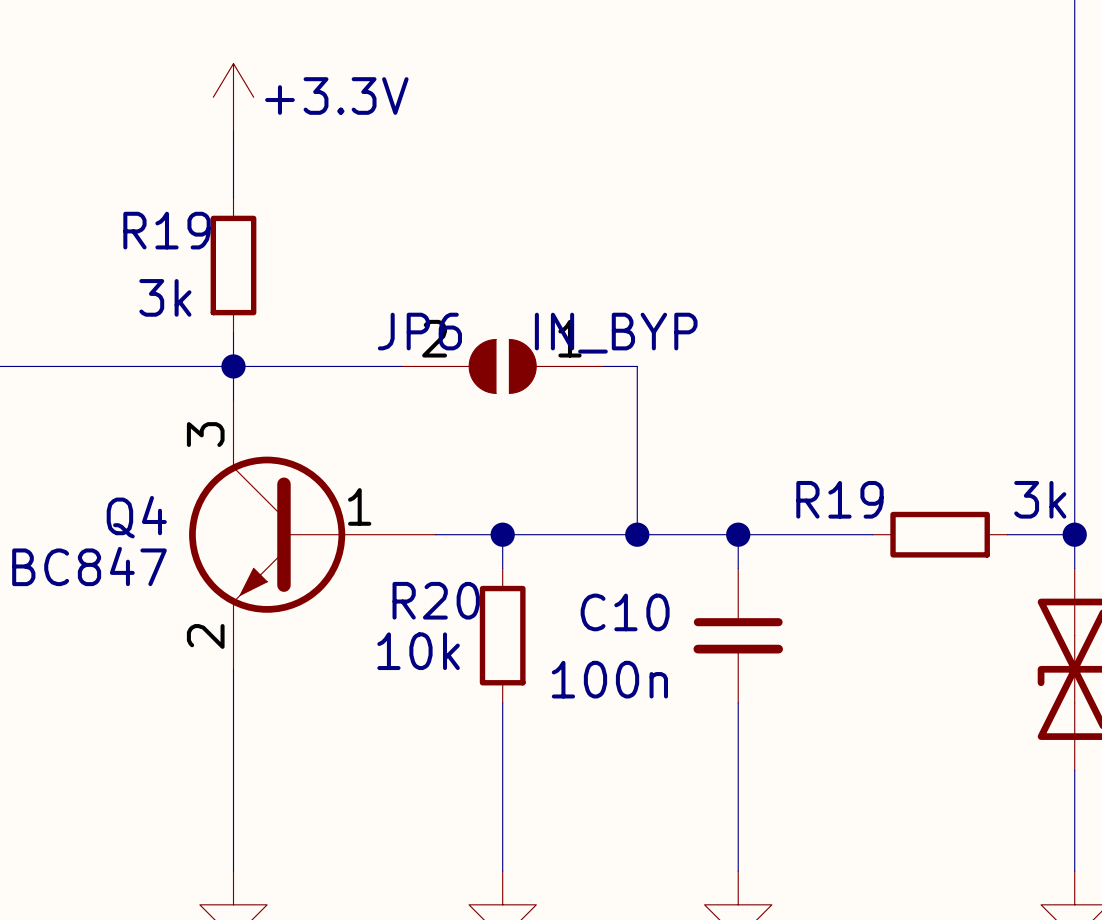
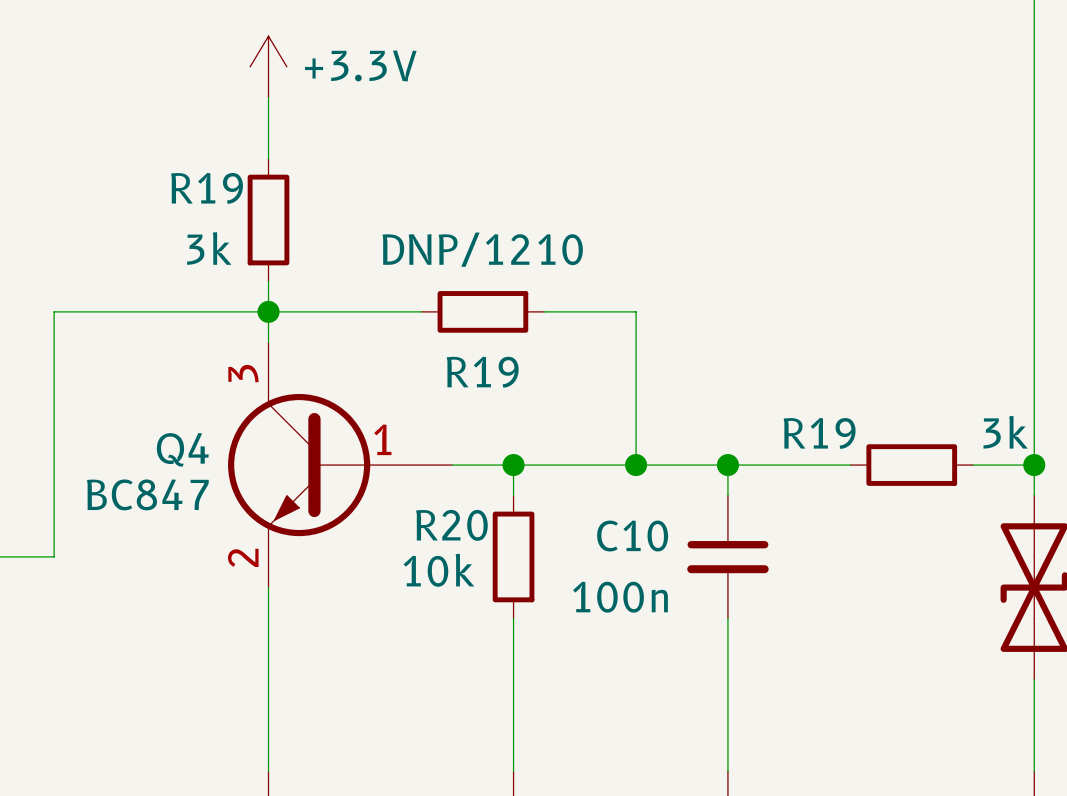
R19: none -> DNP/1210 (482, 311)
JP6: IN_BYP (502, 366) -> none

